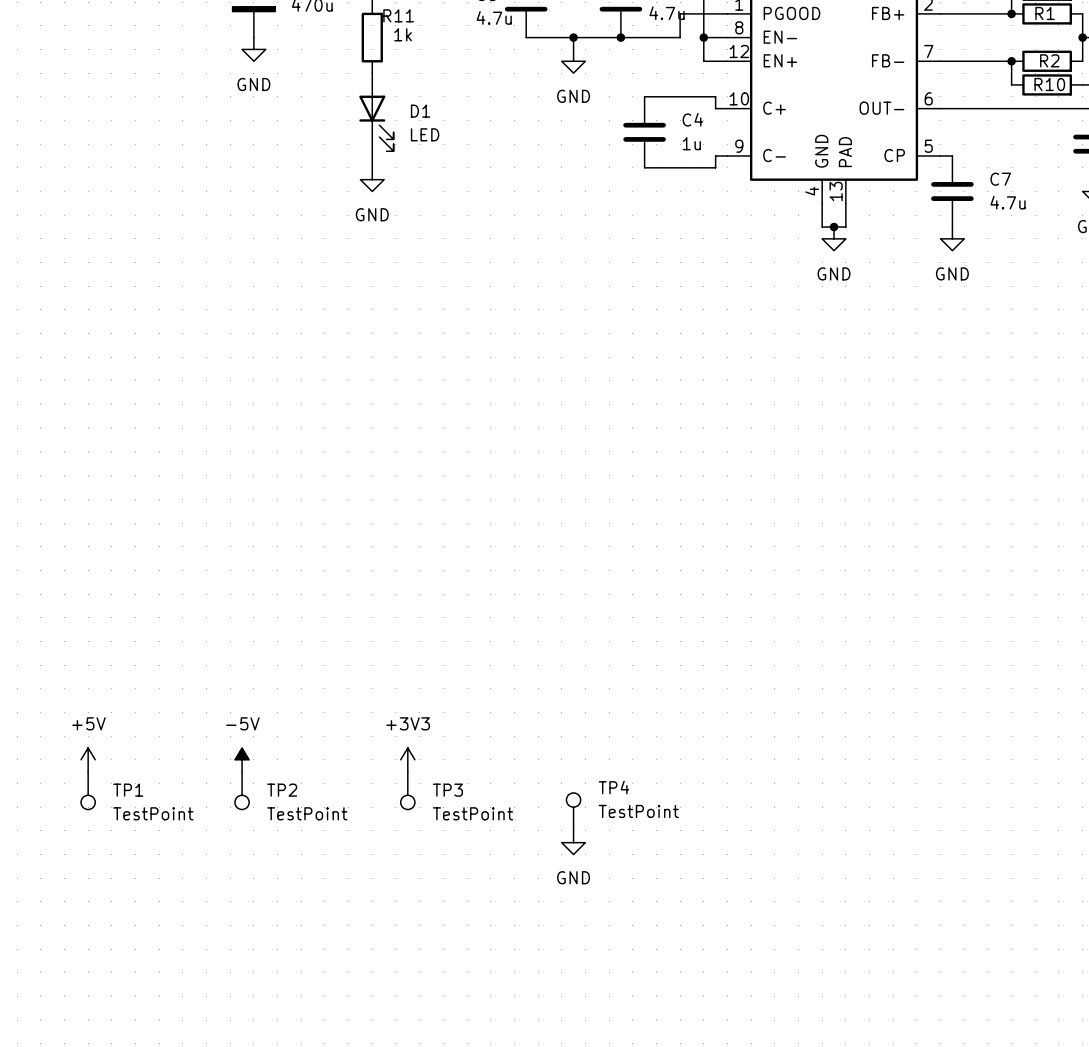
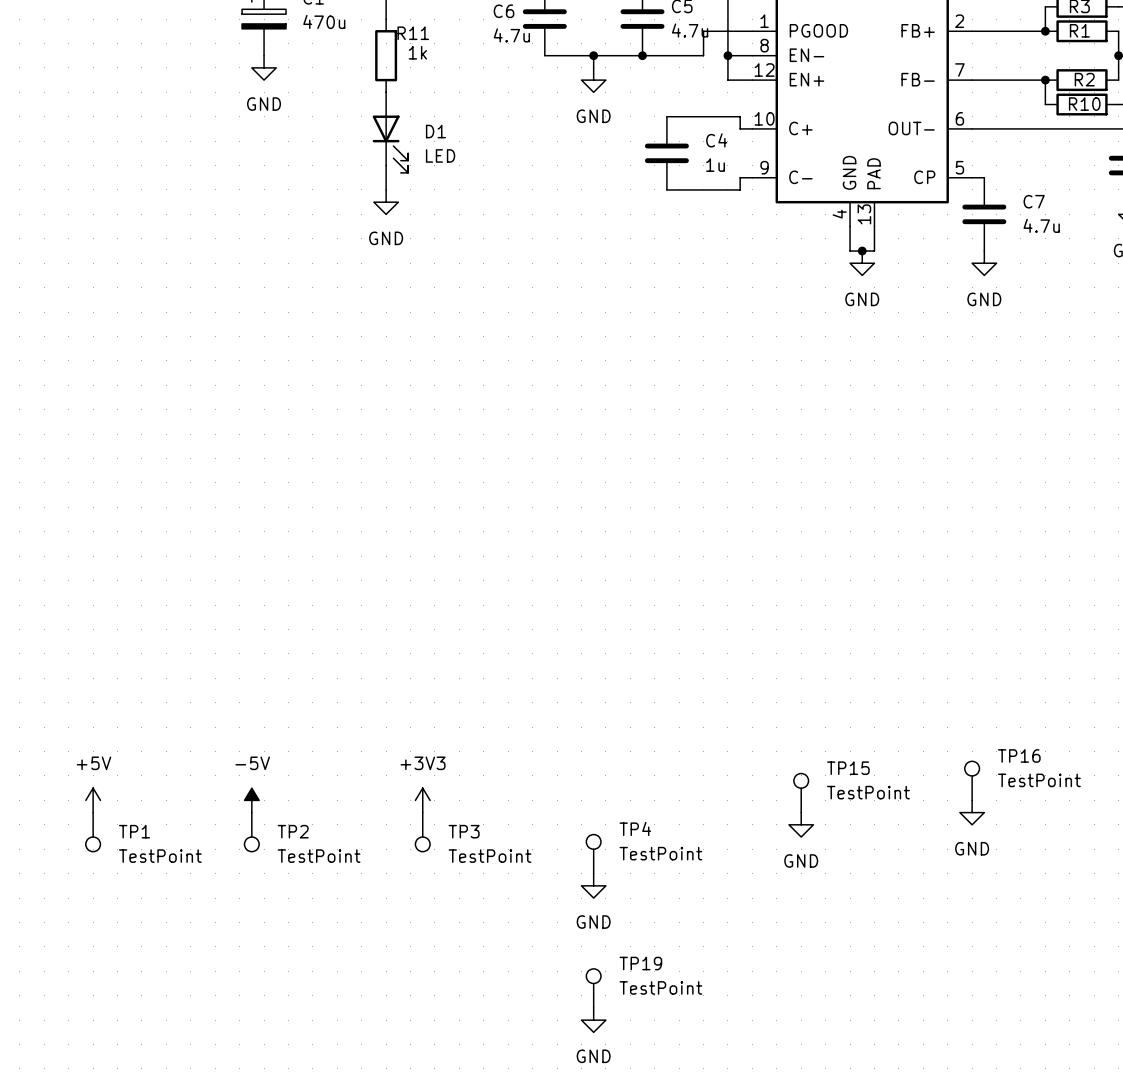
TP16: none -> TestPoint (972, 780)
TP15: none -> TestPoint (801, 793)
power symbol: none -> GND (972, 812)
power symbol: none -> GND (801, 824)
TP19: none -> TestPoint (593, 988)
power symbol: none -> GND (593, 1020)

